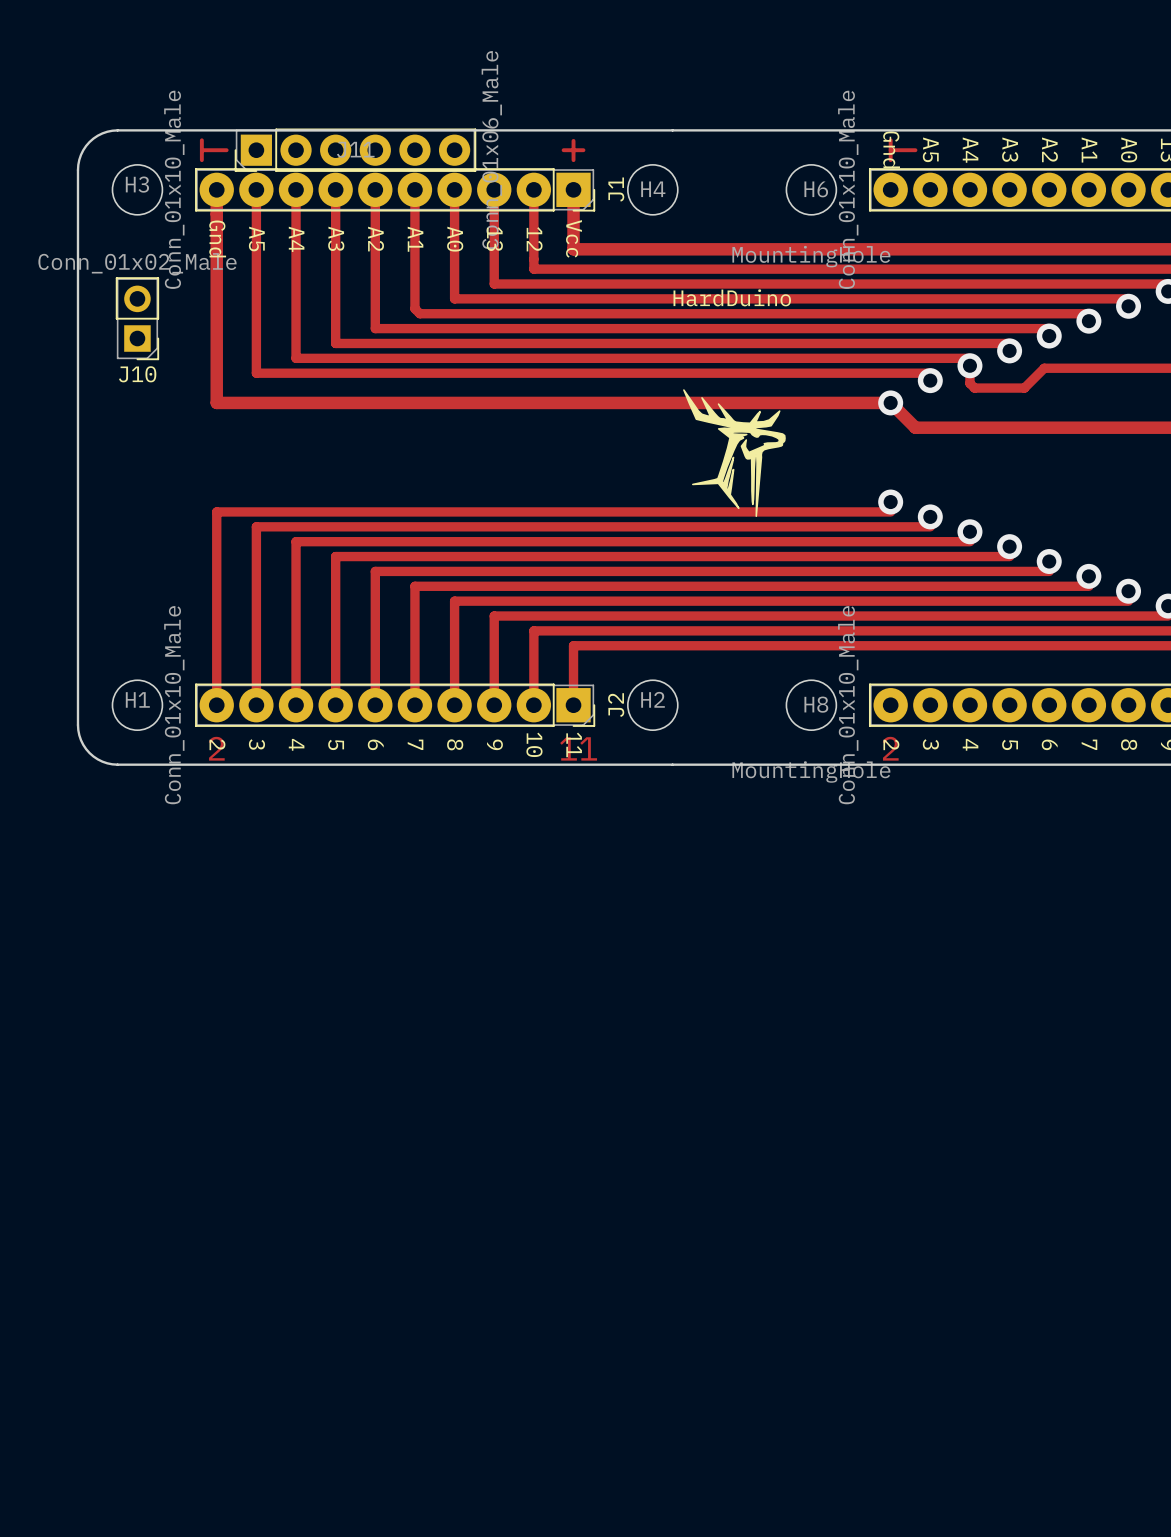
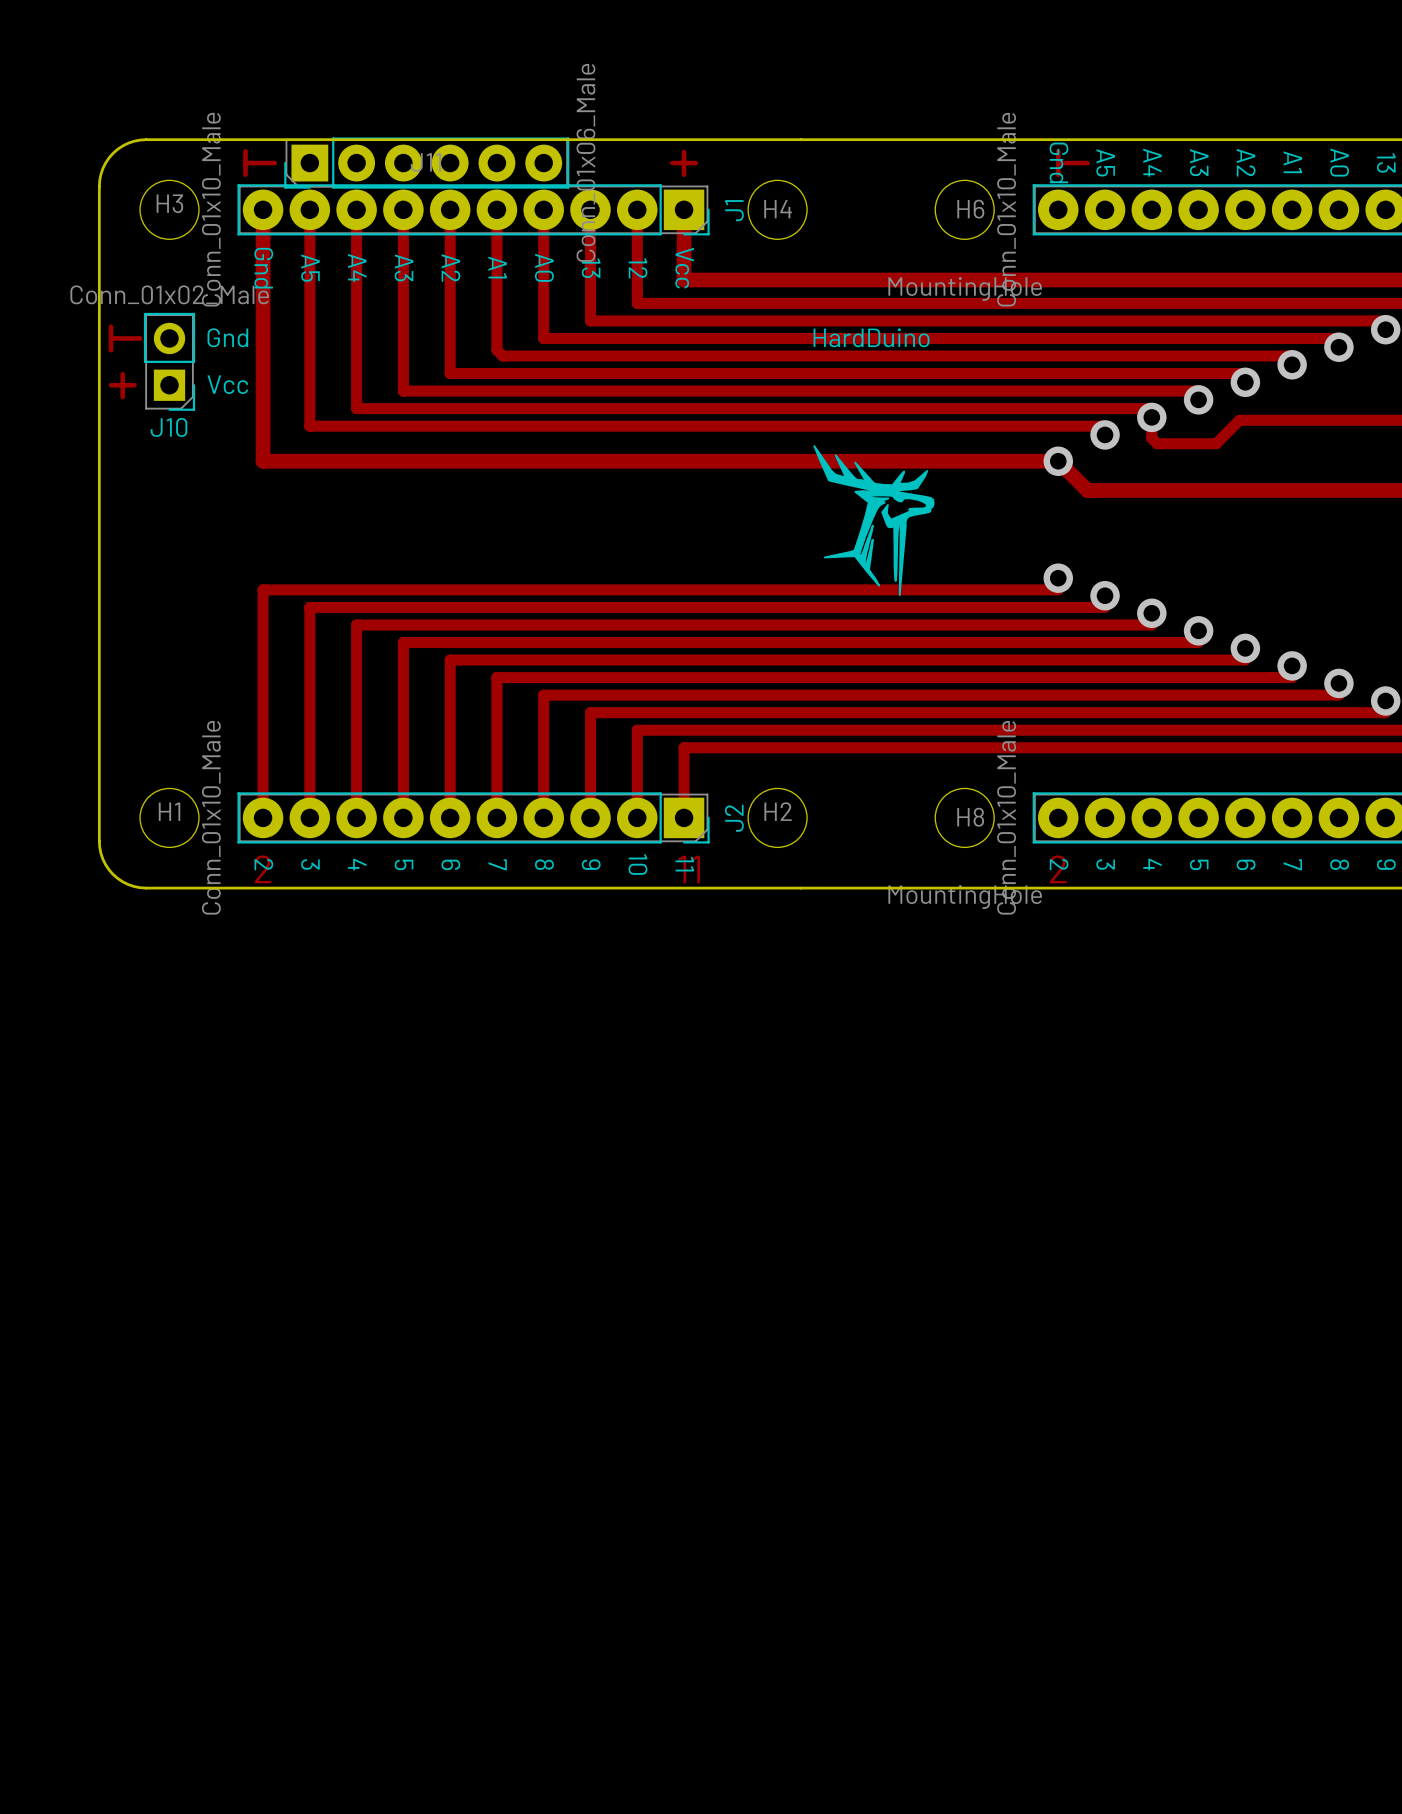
track: none -> (111, 326) (111, 350)
text: none -> Gnd (227, 337)
track: none -> (111, 338) (140, 338)
track: none -> (122, 374) (122, 396)
track: none -> (111, 385) (134, 385)
text: none -> Vcc (227, 384)

